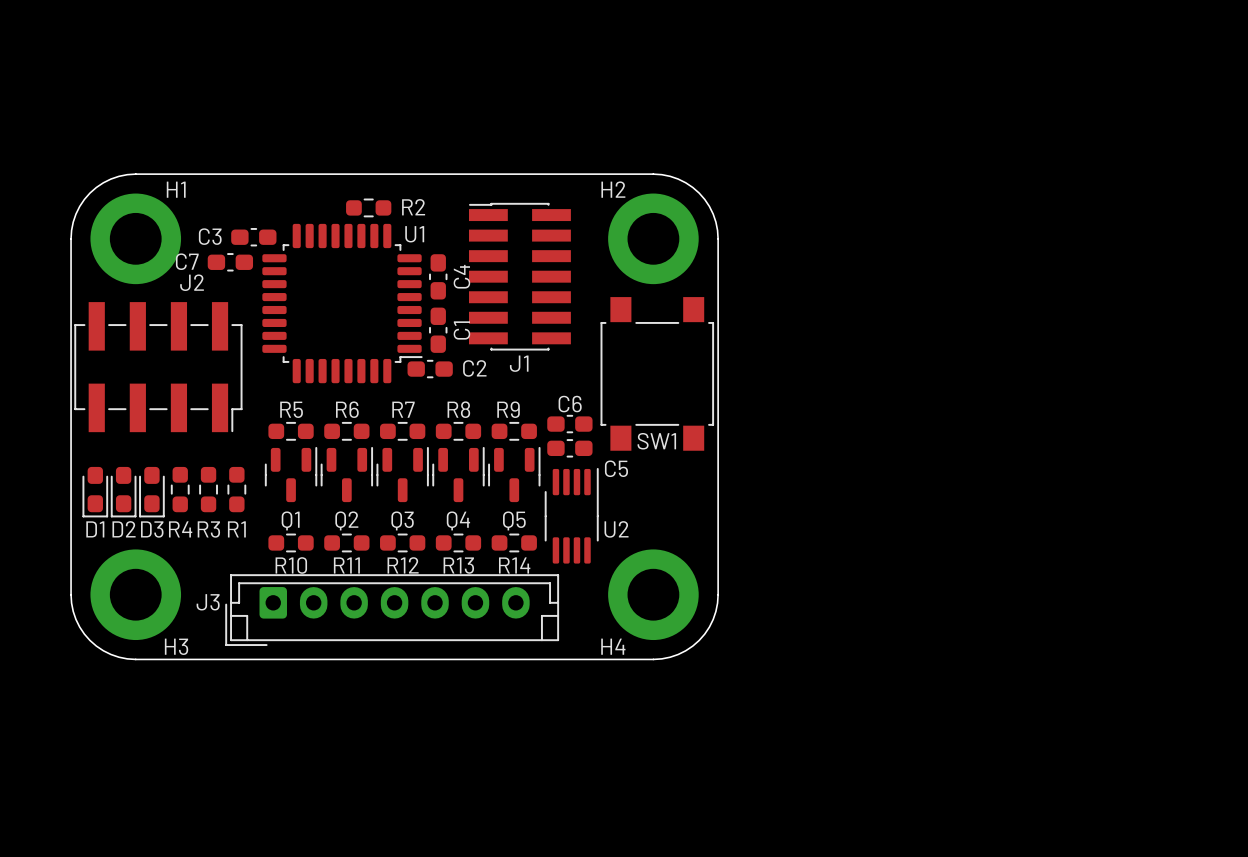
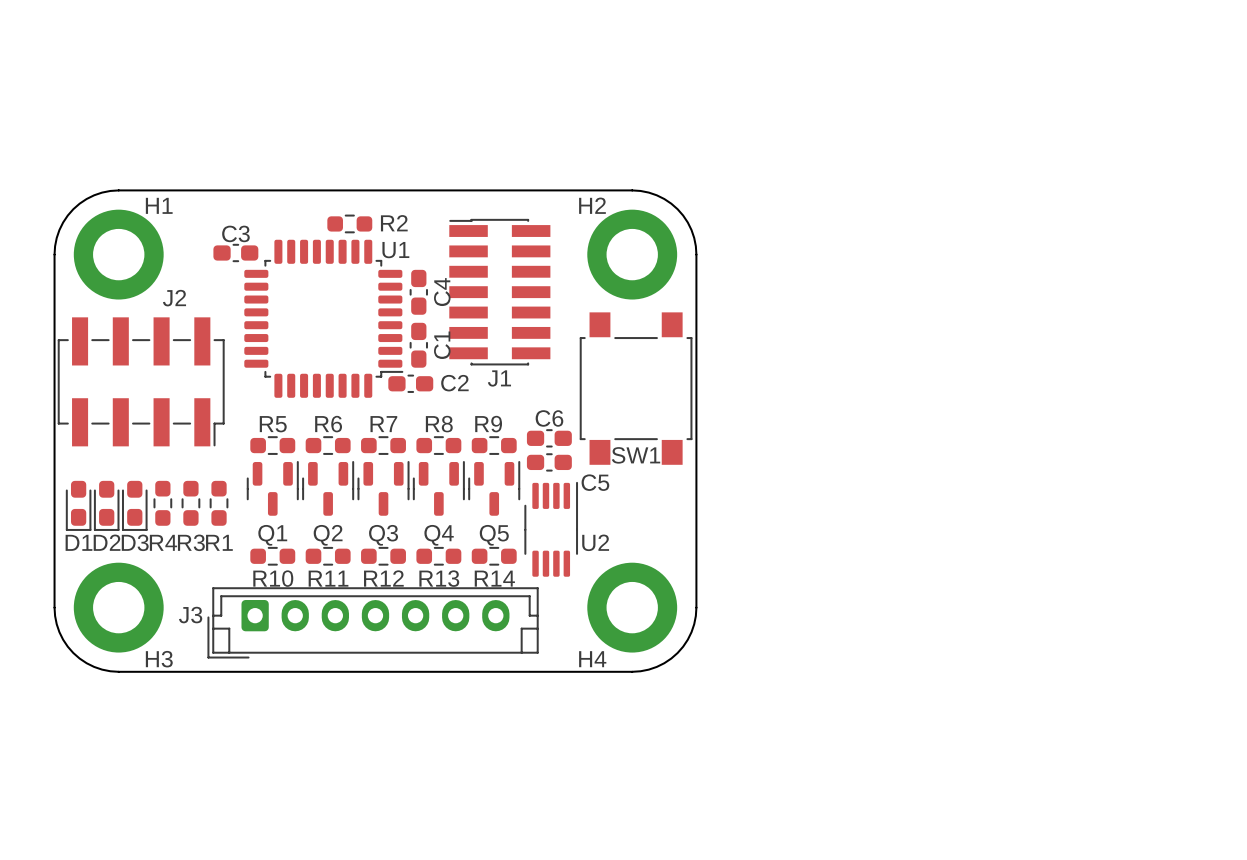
C3 name position: C3 (210, 236) -> C3 (235, 233)
C7: (230, 262) -> none

